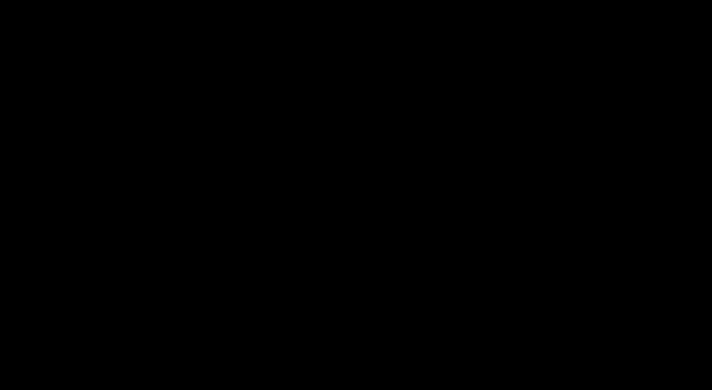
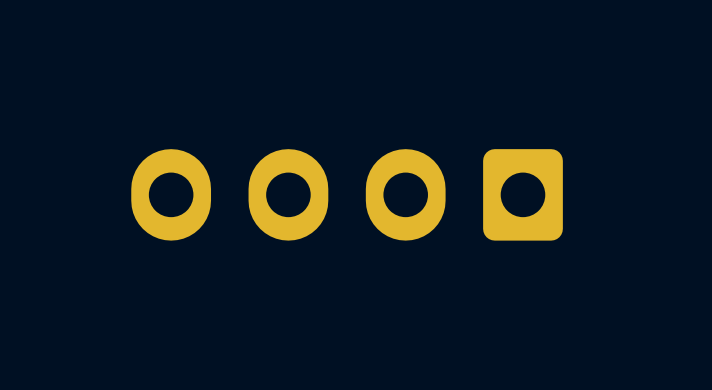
part: none -> (347, 194)

